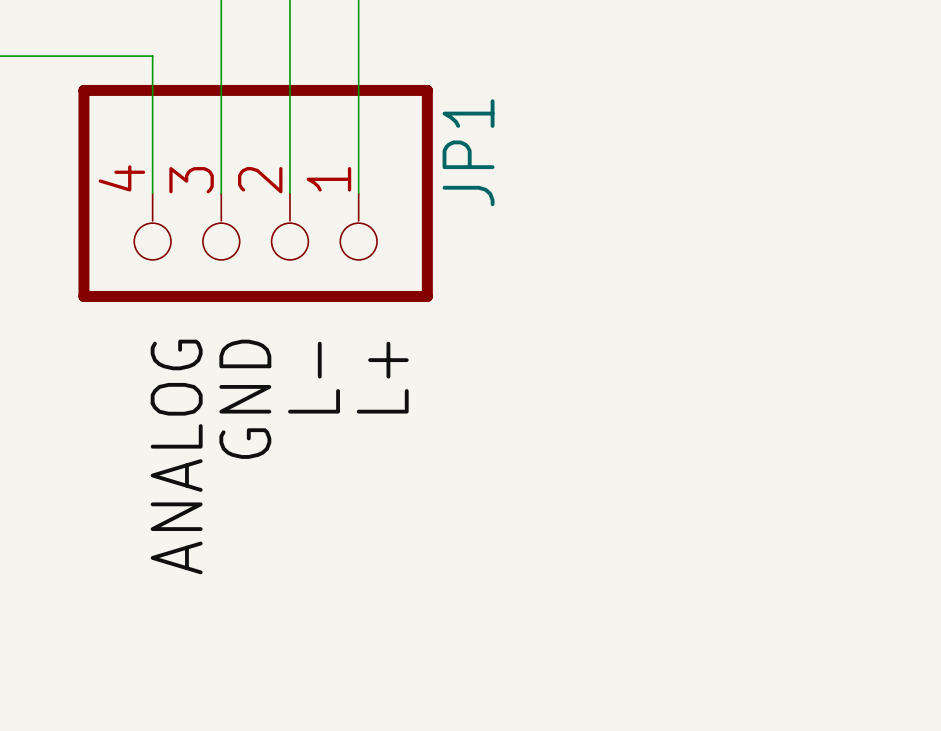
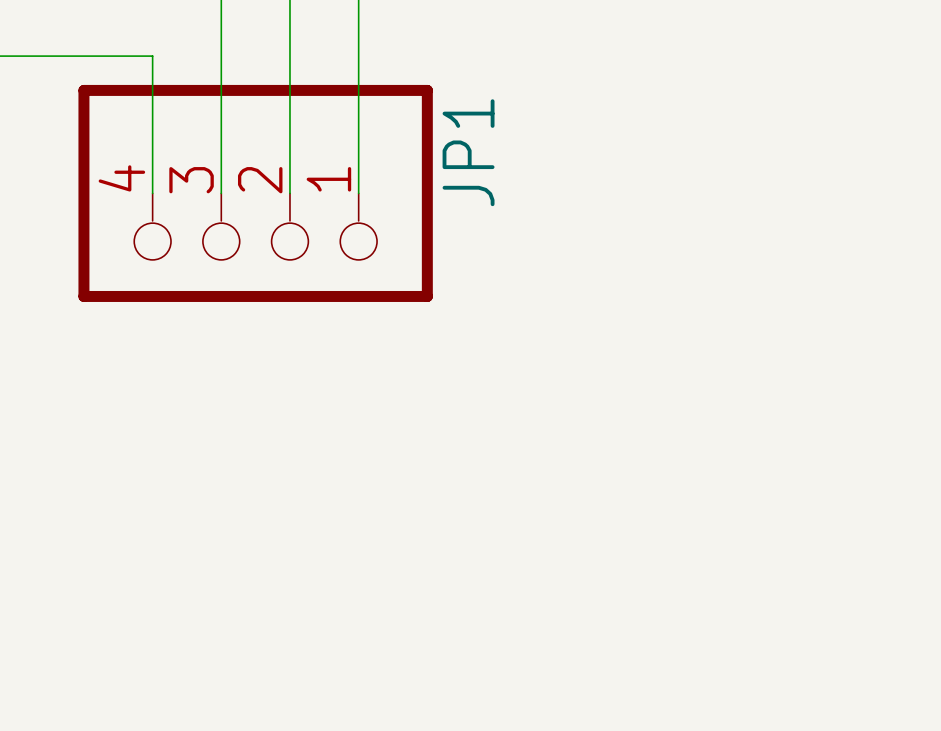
label: L- (314, 377) -> none
label: L+ (382, 377) -> none
label: GND (245, 399) -> none
label: ANALOG (176, 456) -> none

